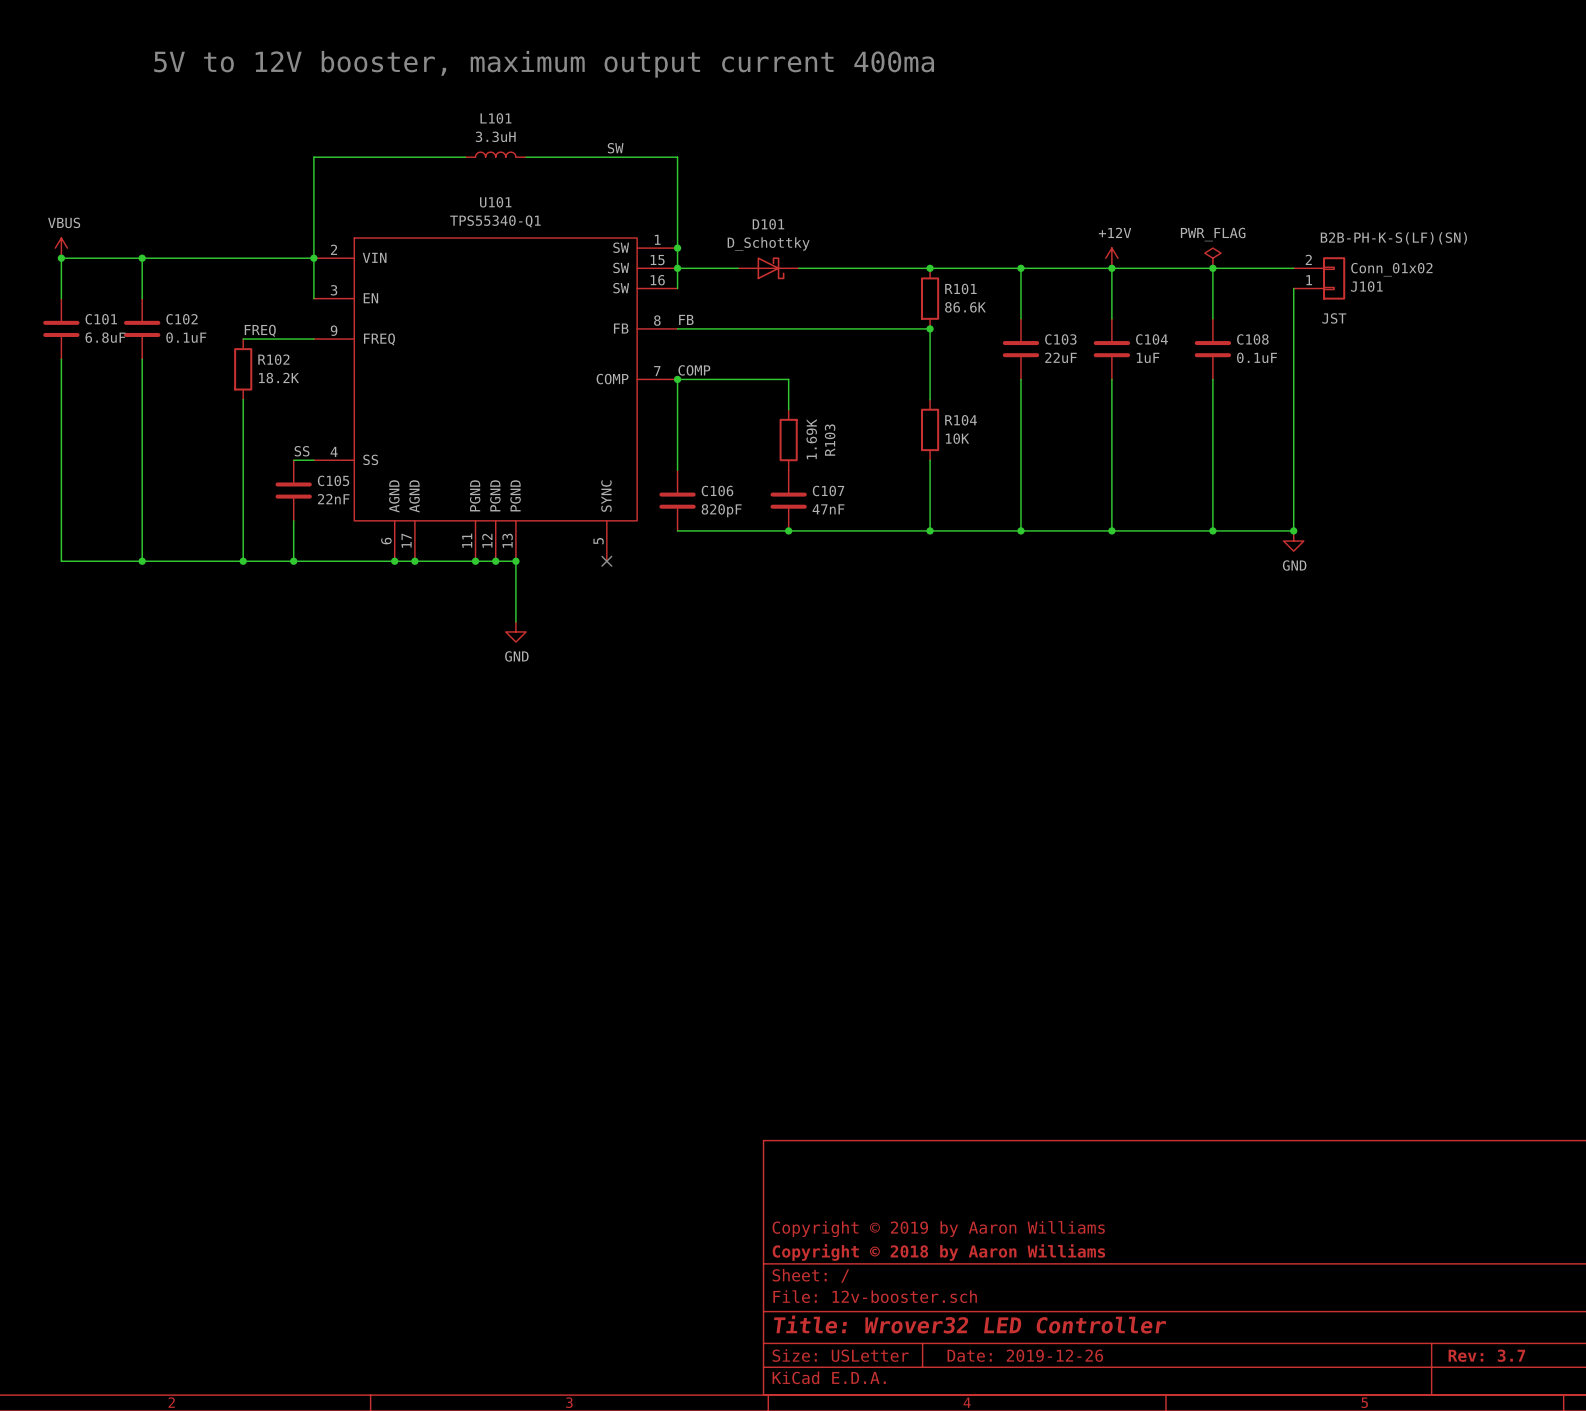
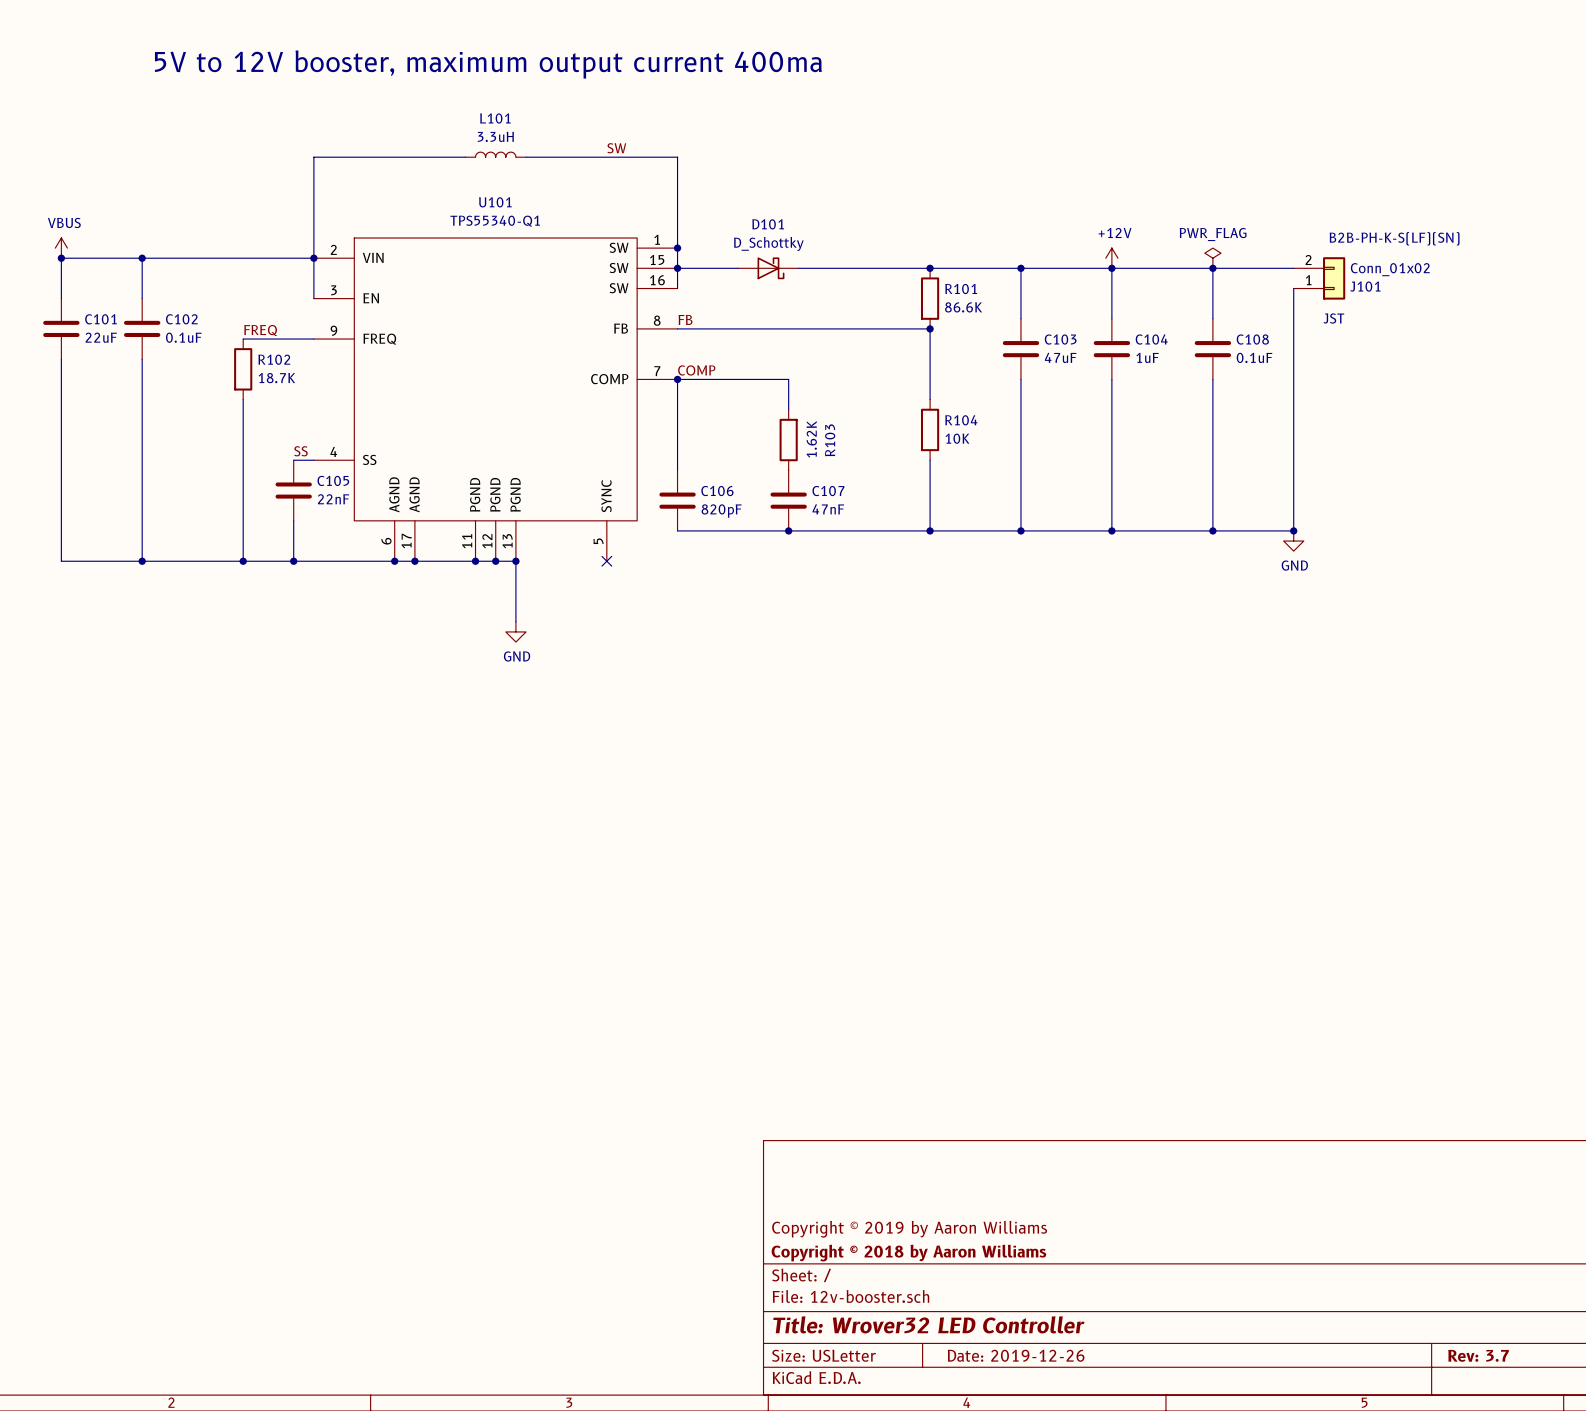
C101 value: 6.8uF (105, 337) -> 22uF (101, 337)
C103 value: 22uF (1061, 357) -> 47uF (1060, 357)
R102 value: 18.2K (278, 378) -> 18.7K (276, 378)
R103 value: 1.69K (811, 439) -> 1.62K (811, 439)

